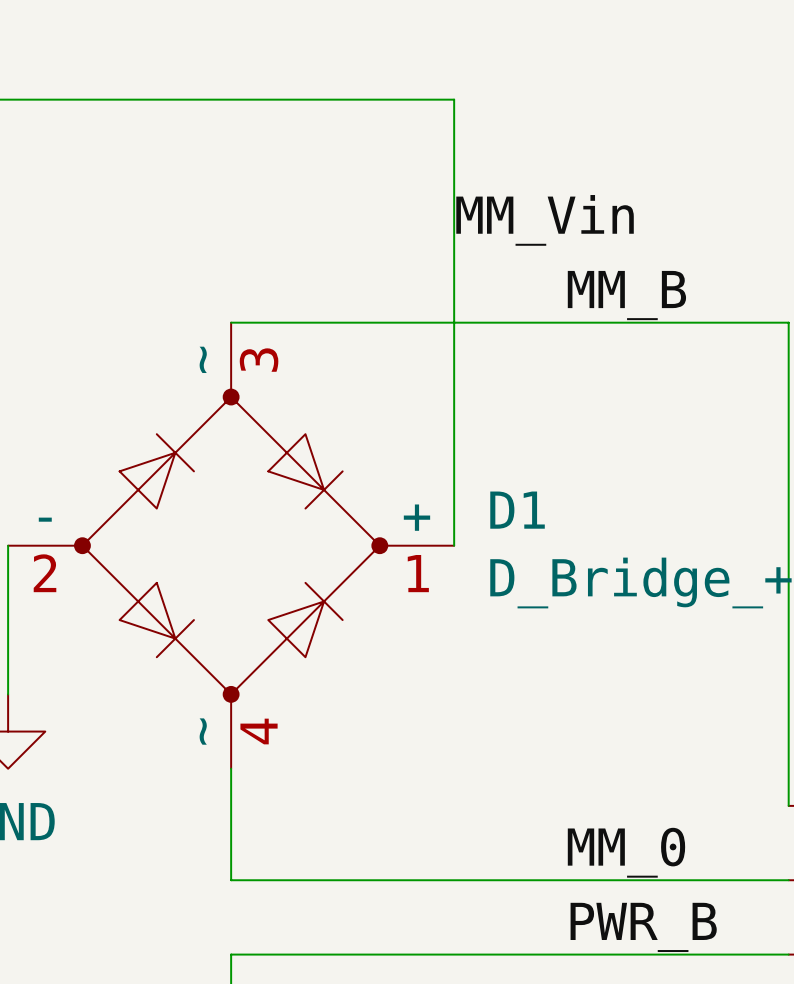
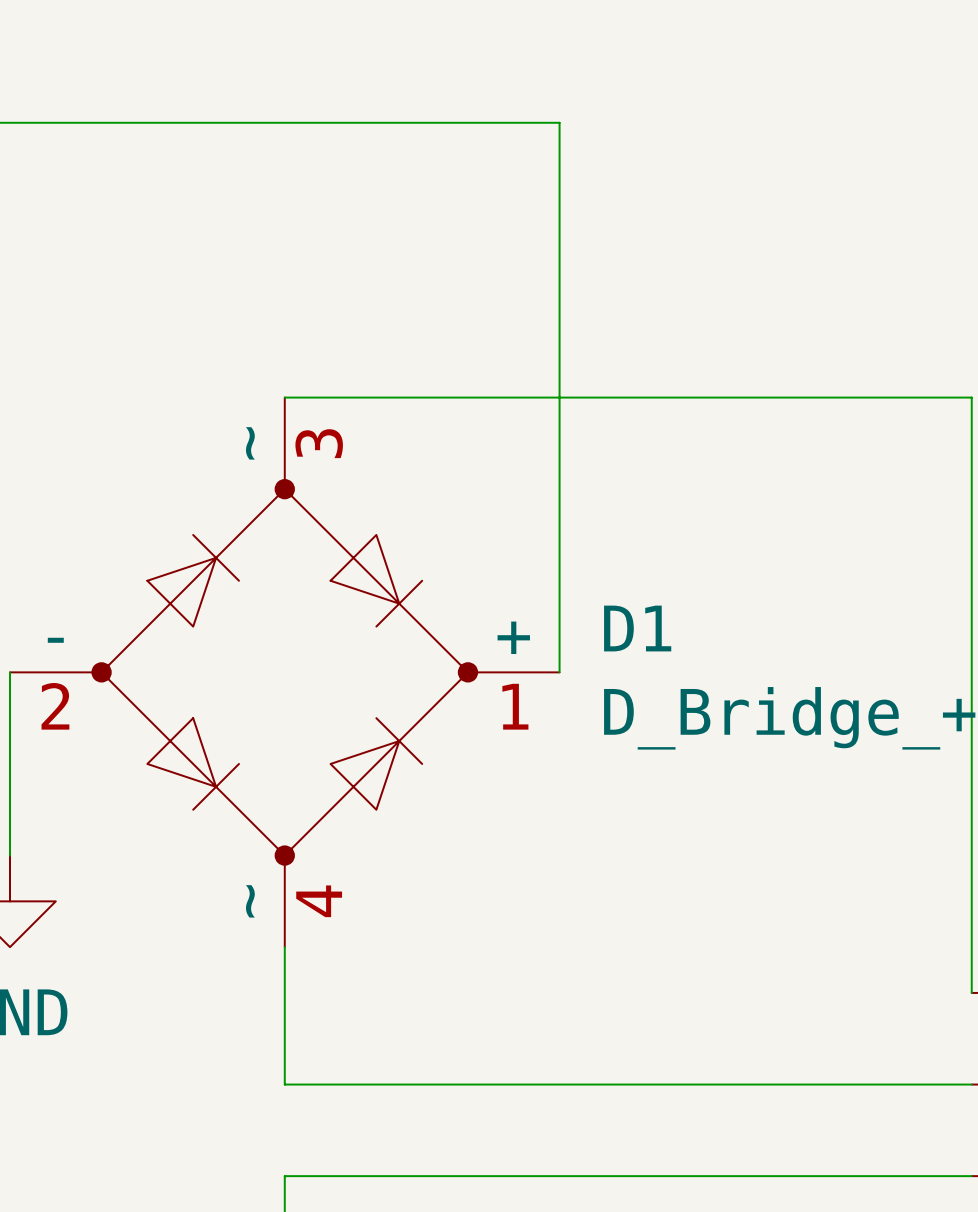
label: MM_Vin (545, 220) -> none
label: MM_B (626, 295) -> none
label: MM_0 (626, 852) -> none
label: PWR_B (643, 927) -> none

